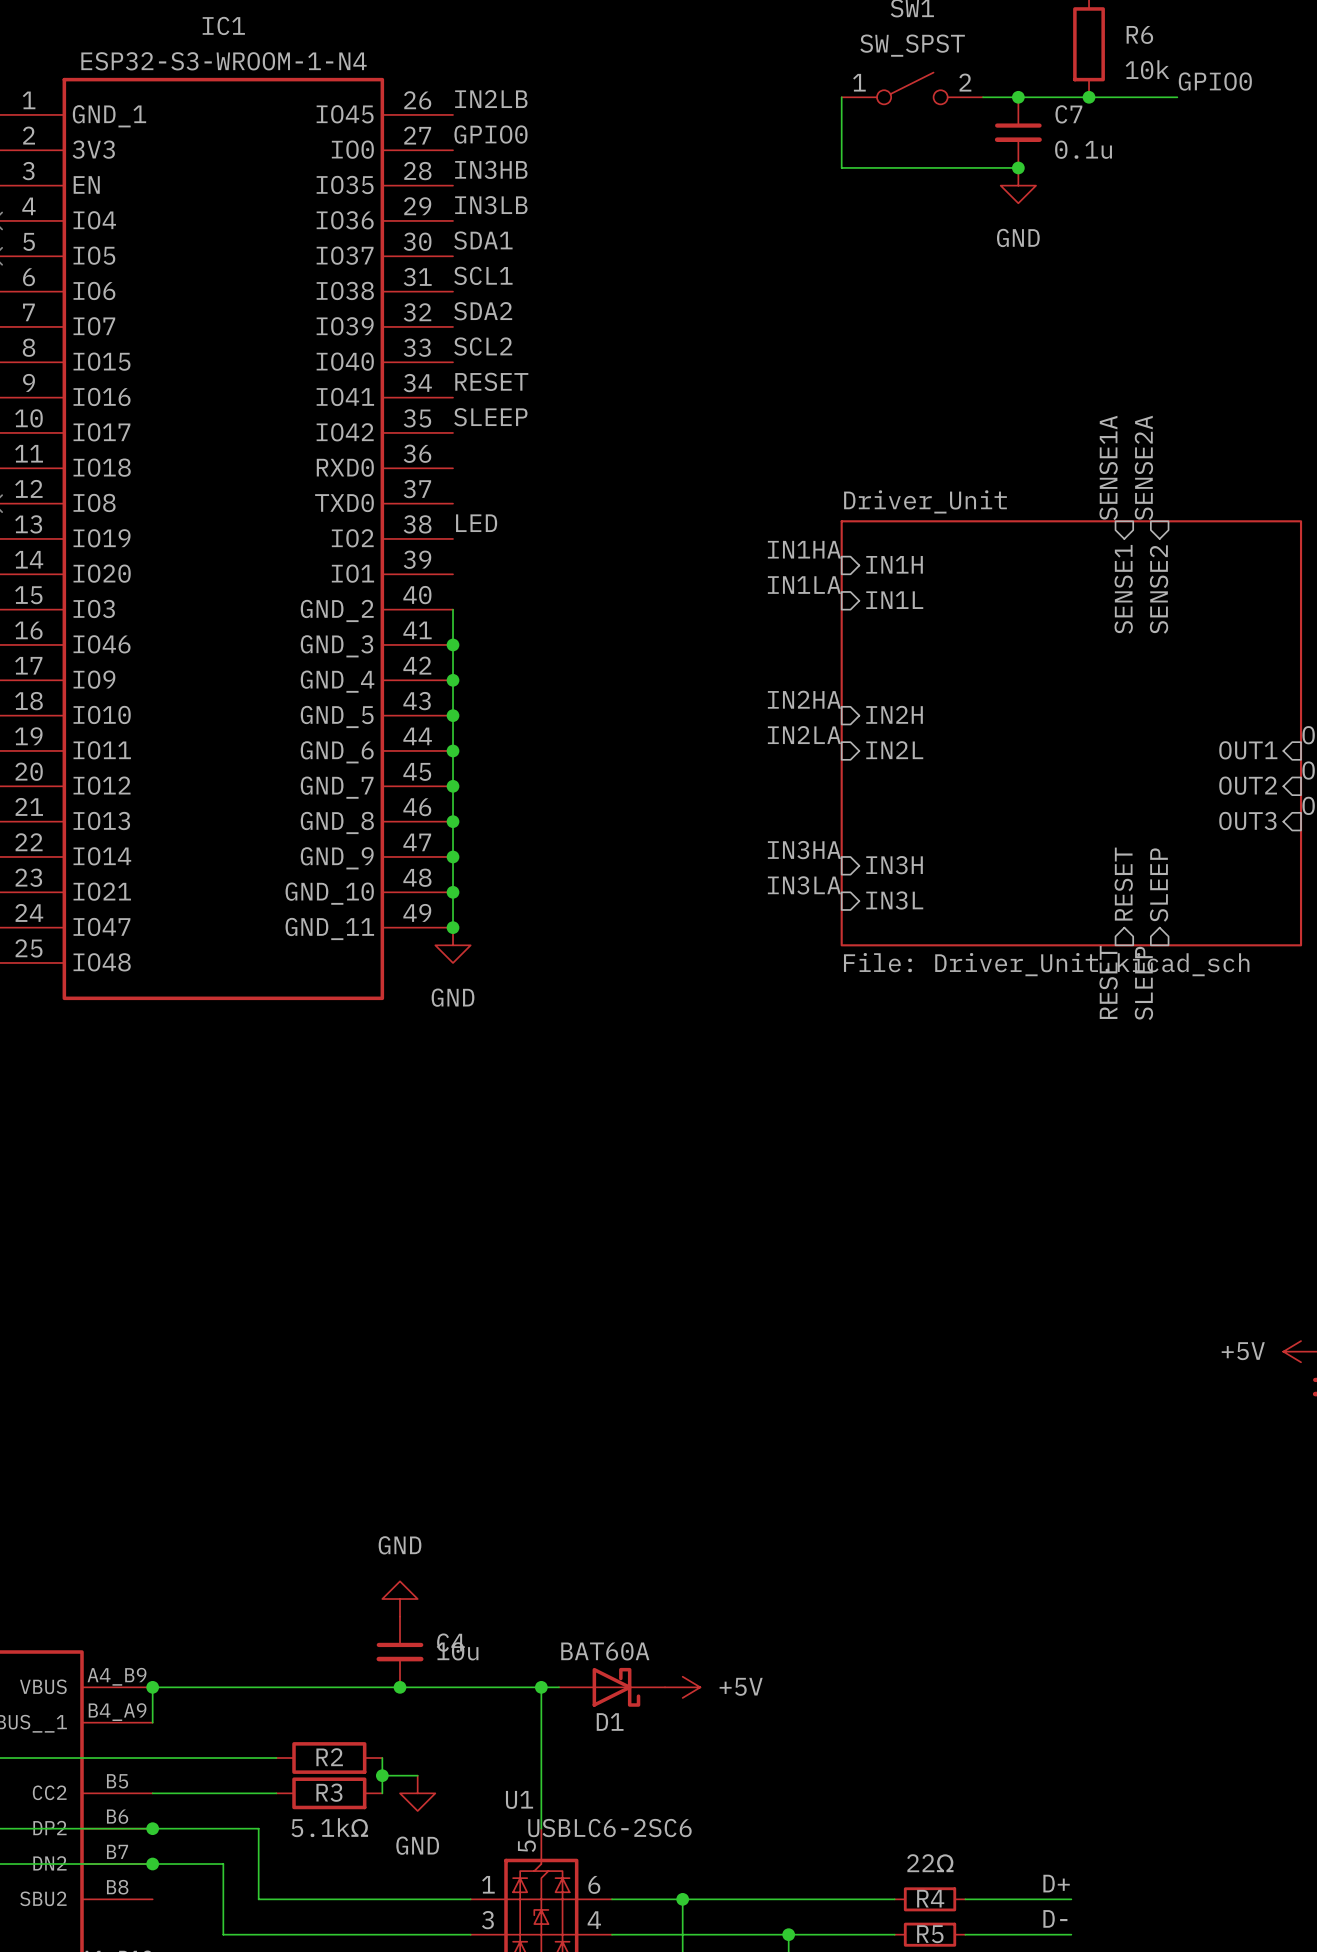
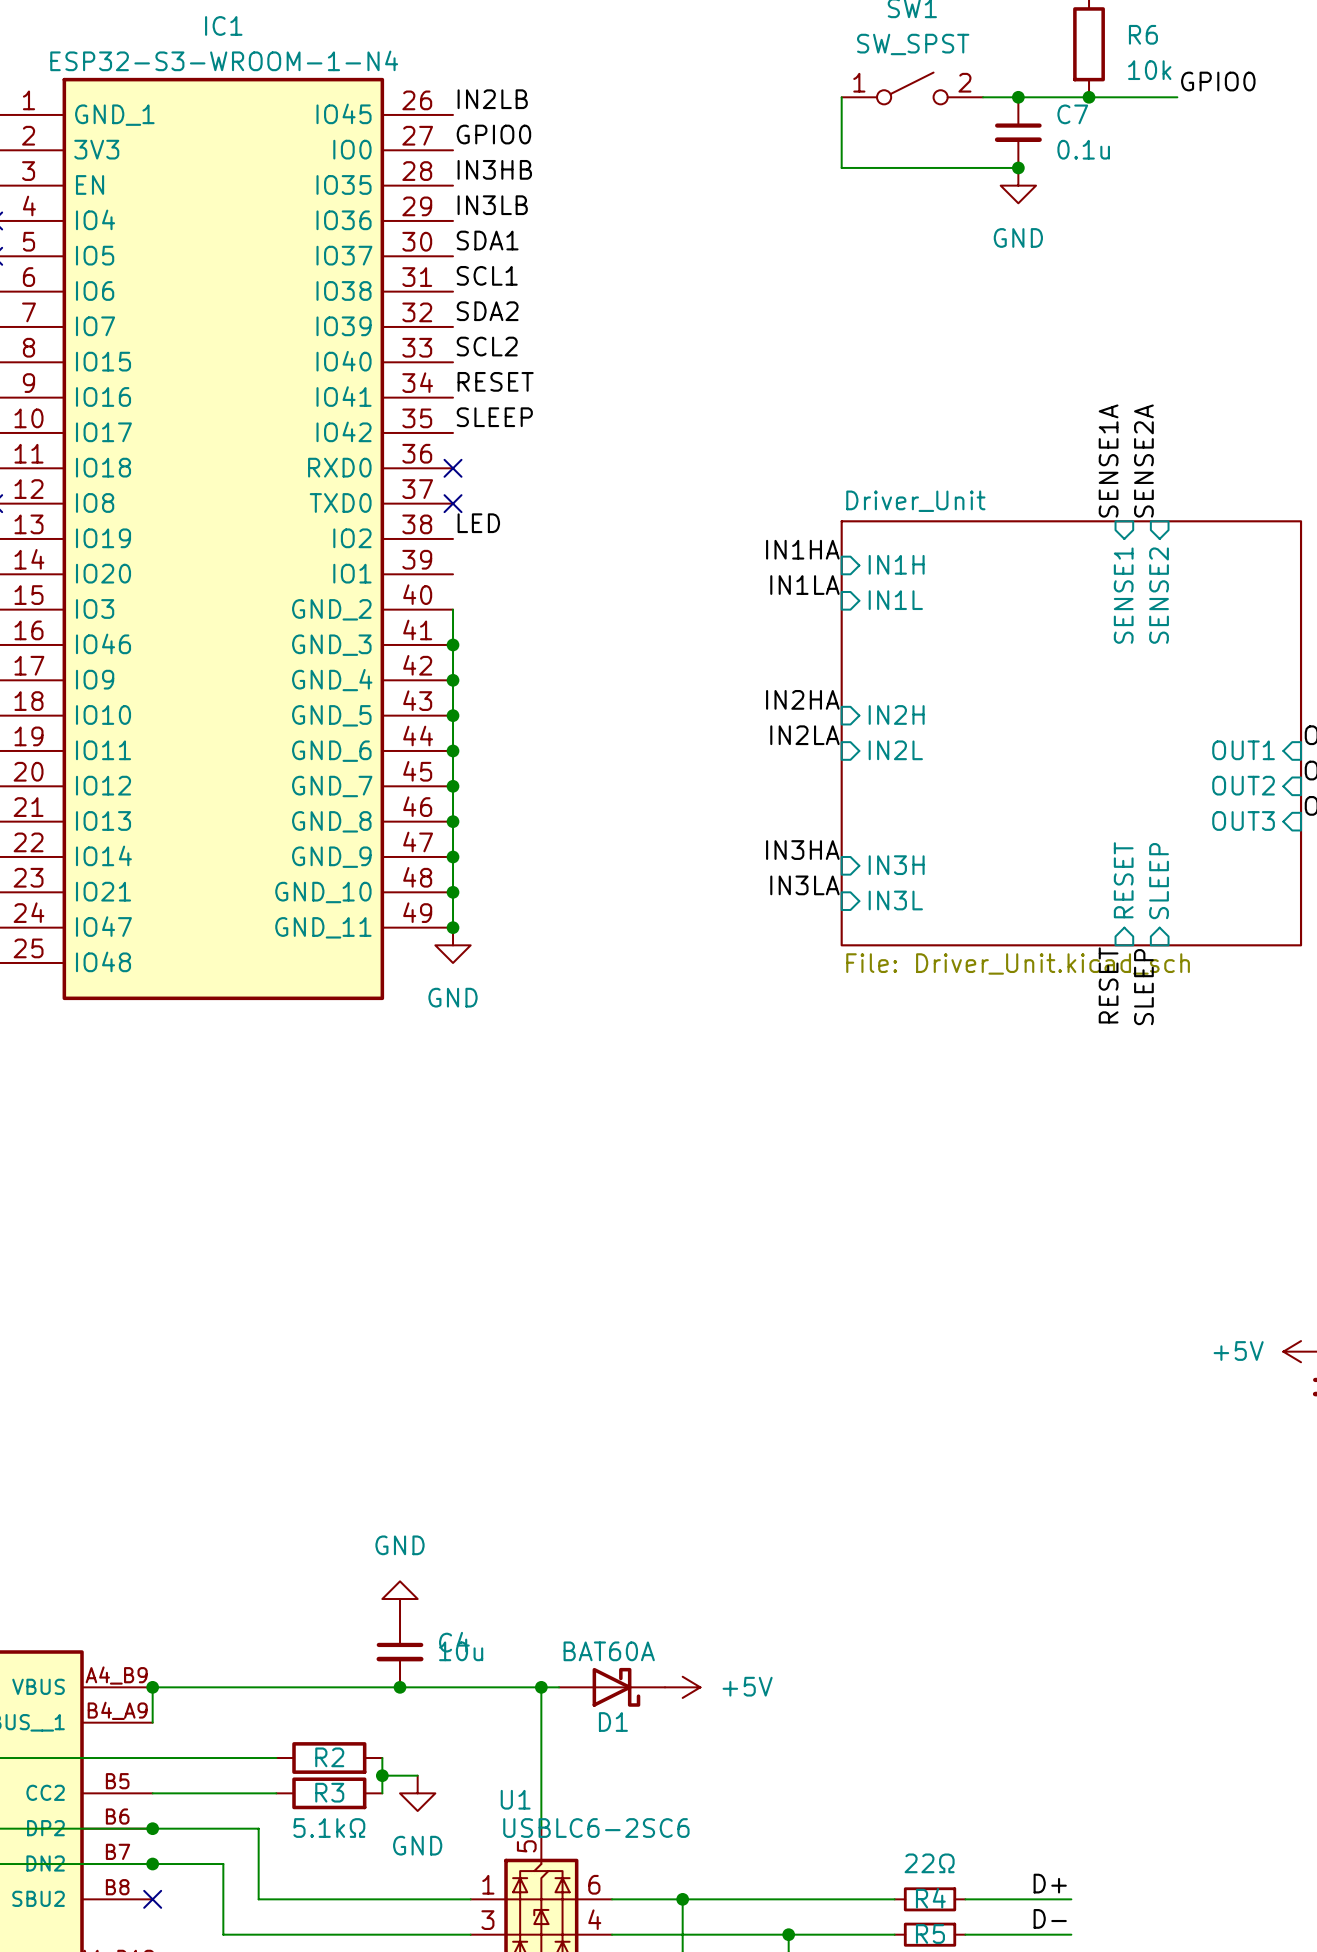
no-connect mark: none -> (453, 468)
no-connect mark: none -> (453, 503)
no-connect mark: none -> (152, 1899)

